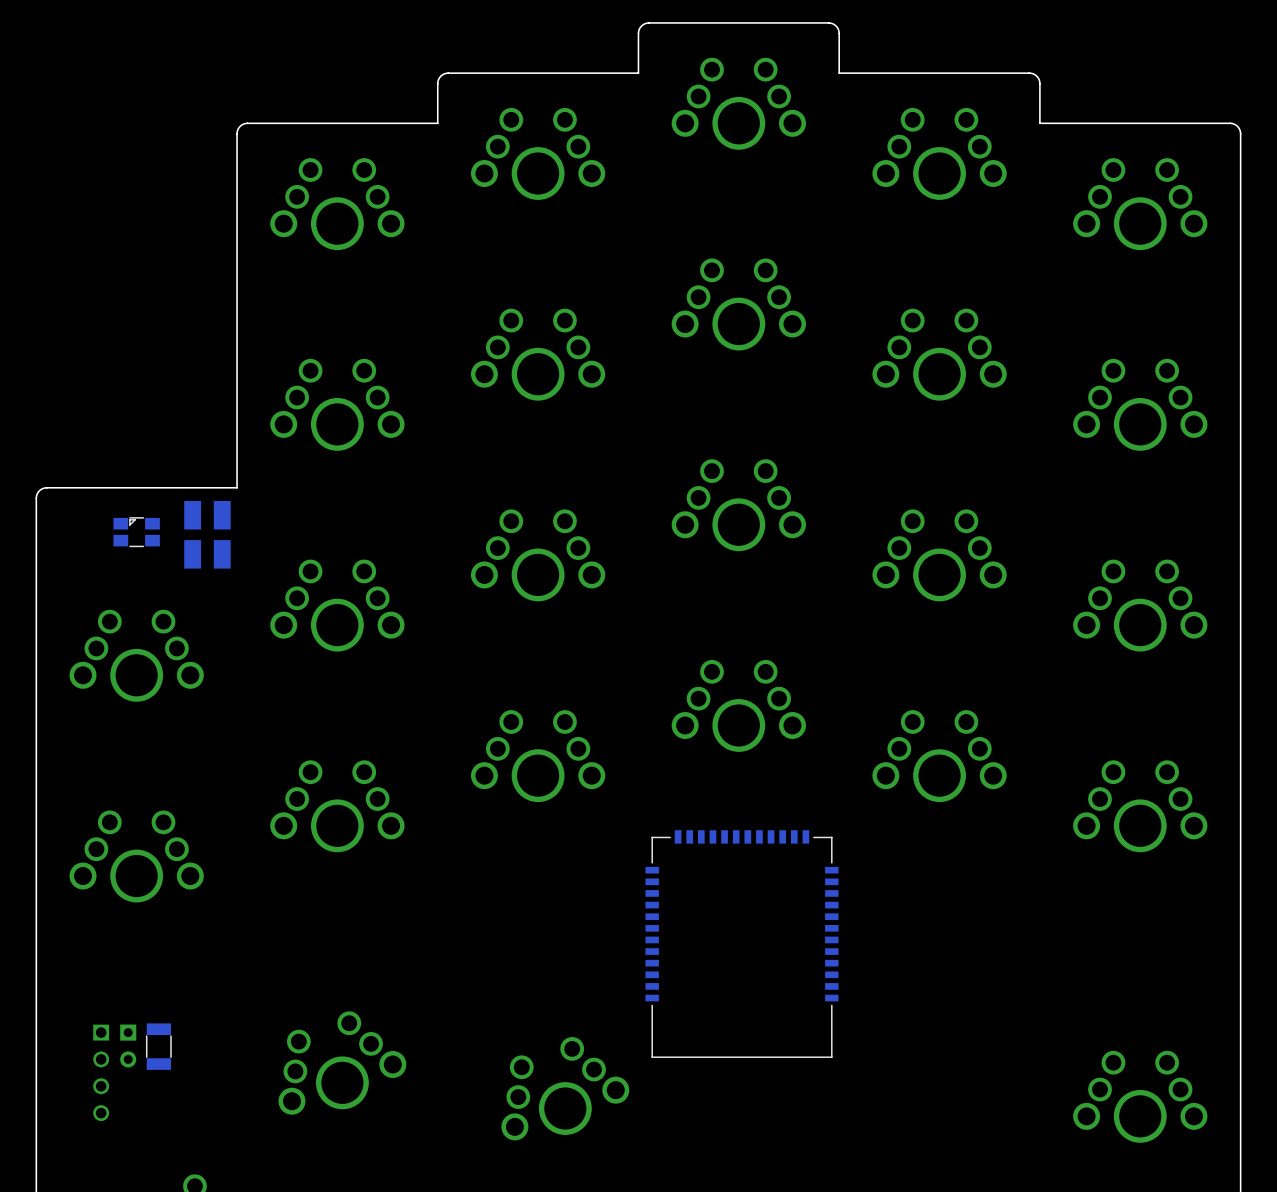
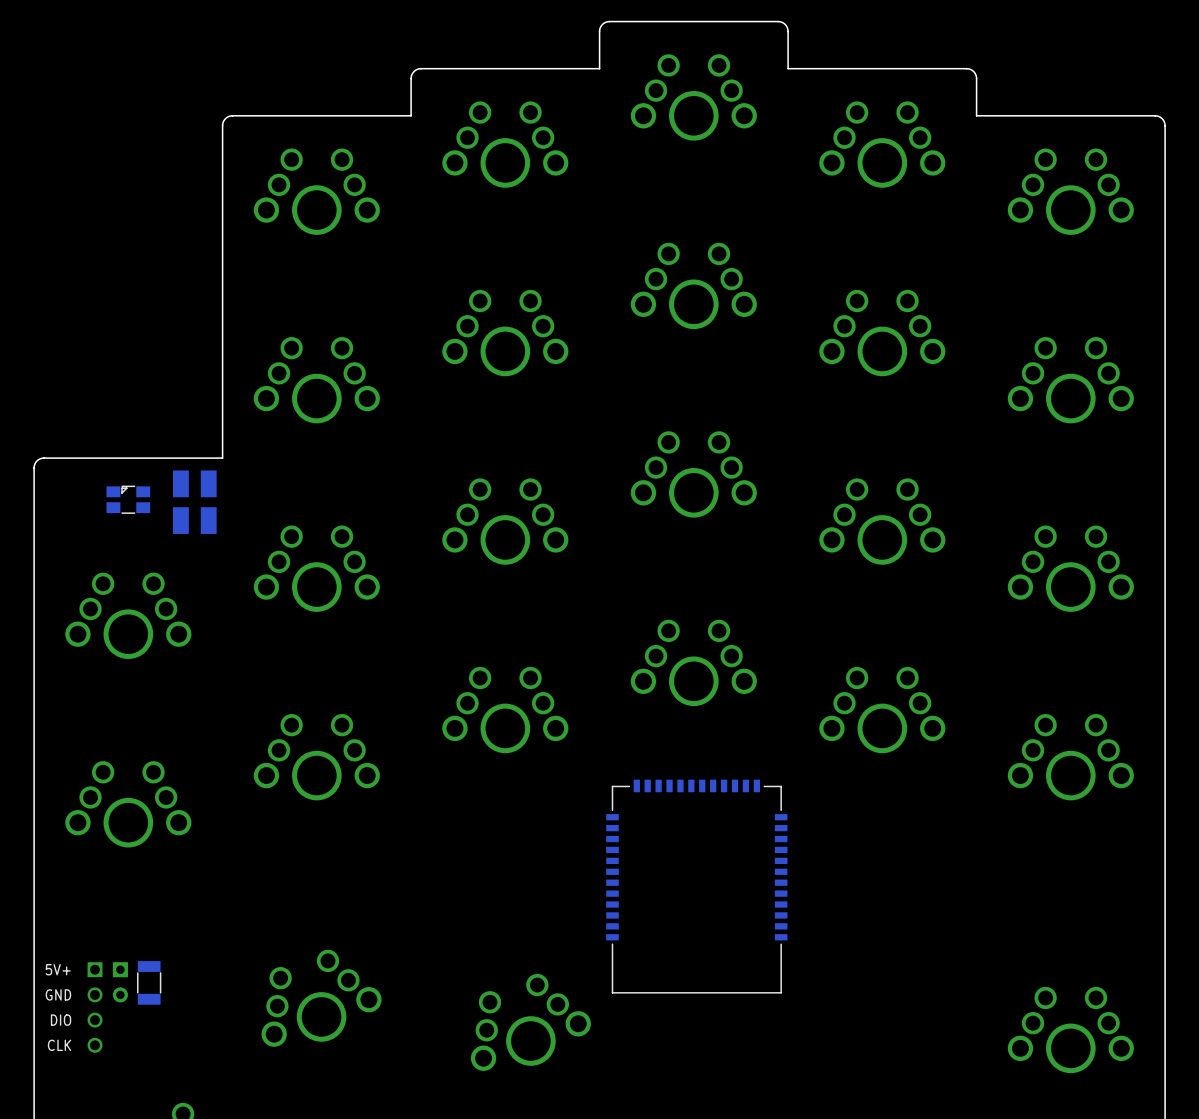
text: none -> 5V+ (58, 969)
text: none -> GND (58, 994)
text: none -> DIO (61, 1020)
text: none -> CLK (59, 1045)

